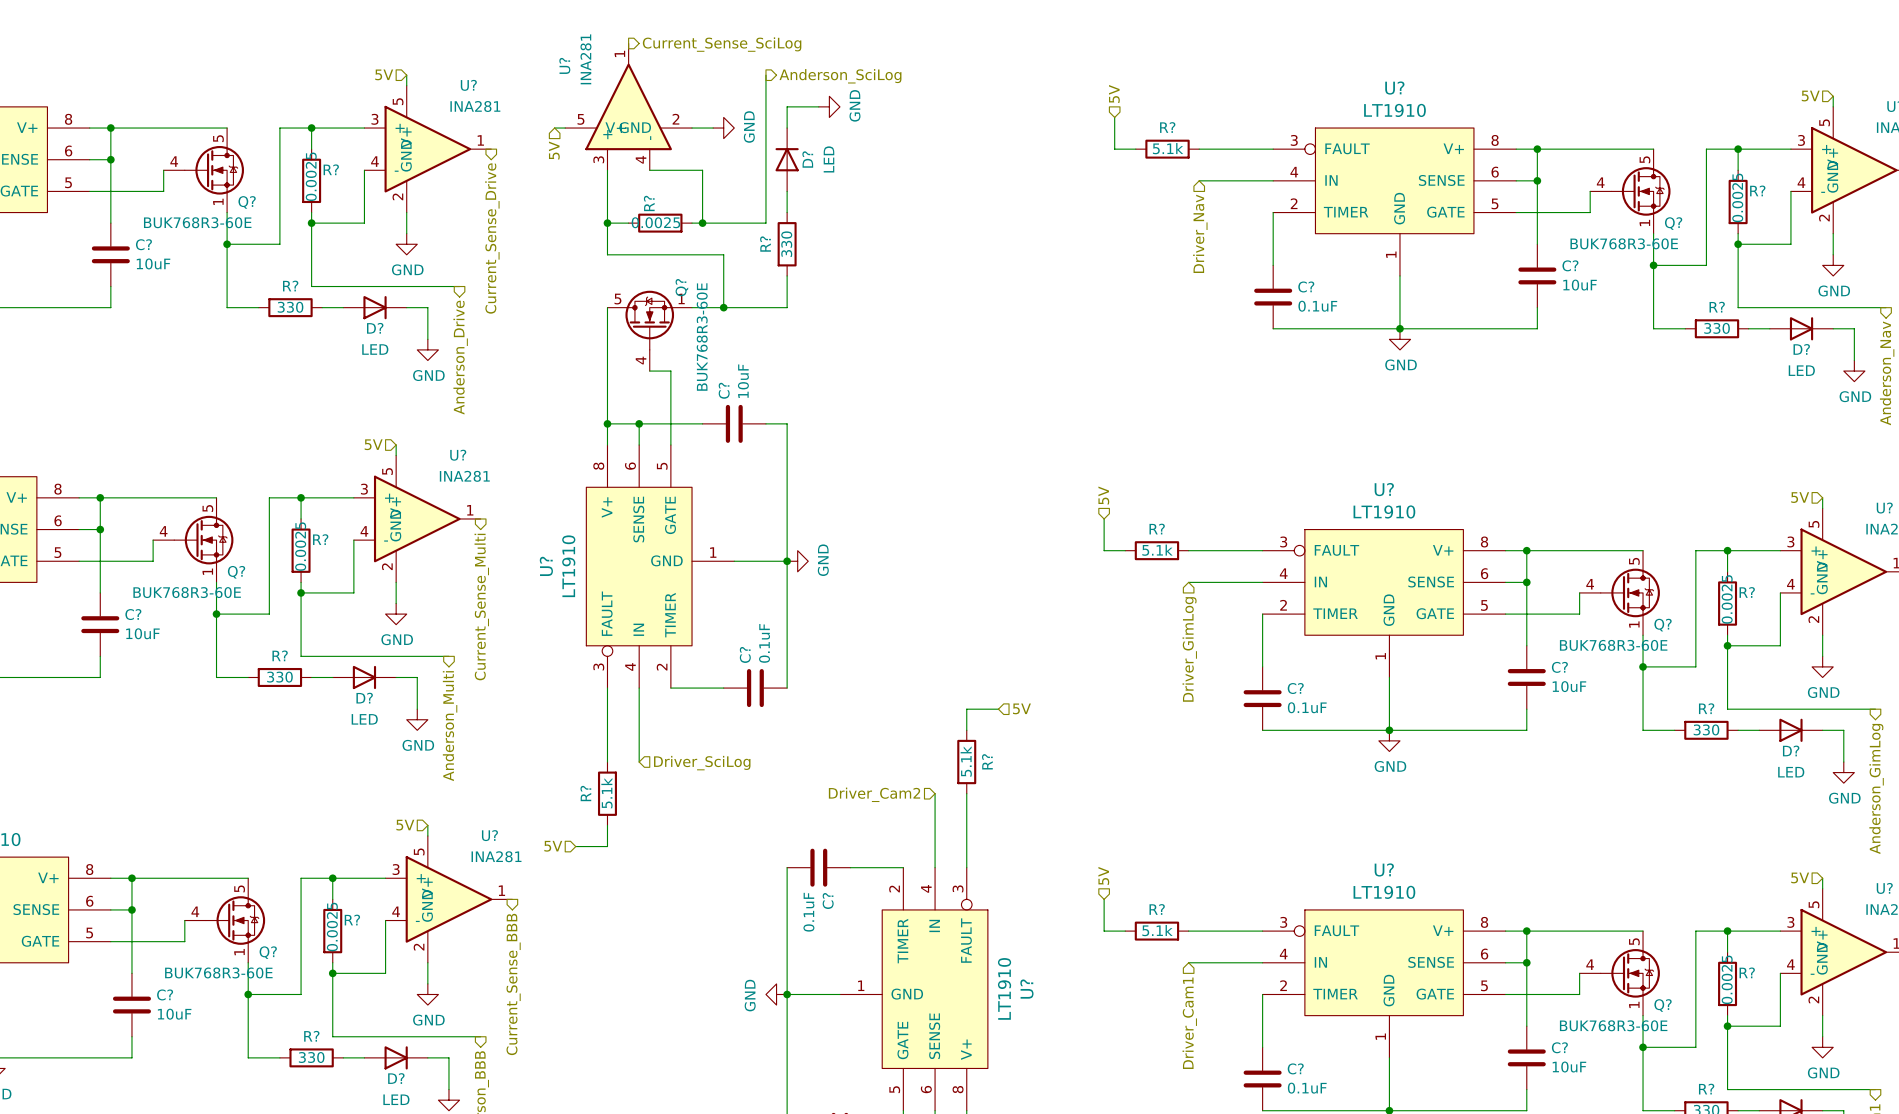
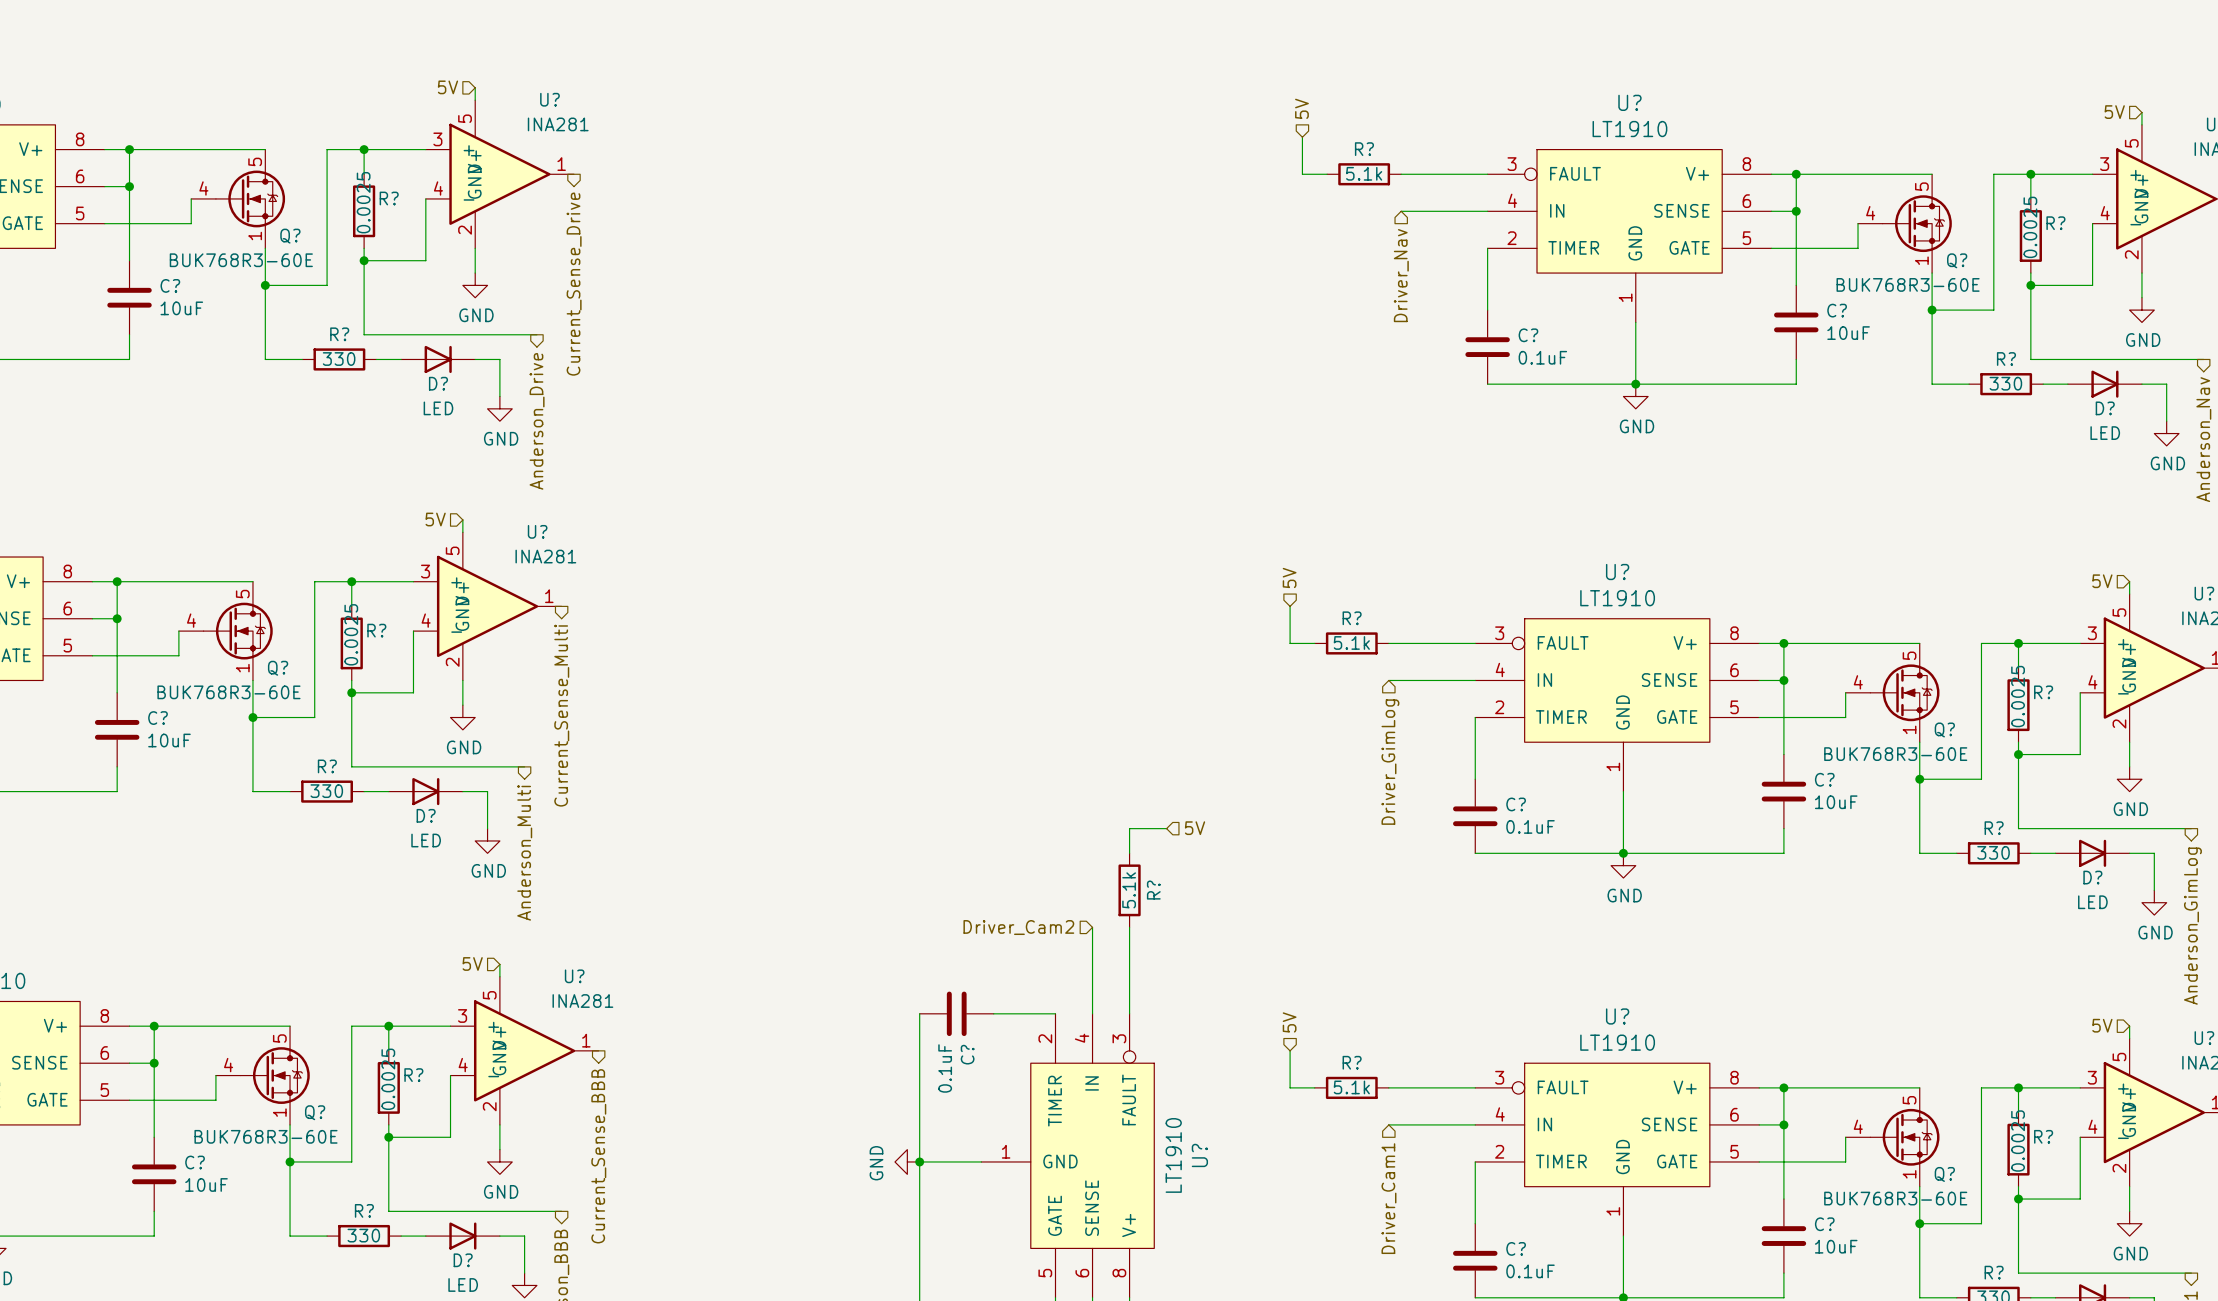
hierarchical label: Current_Sense_SciLog (722, 44) -> none
wire: (765, 75) (765, 223) (692, 223) -> none
hierarchical label: Anderson_SciLog (840, 76) -> none
U?: INA281 (628, 106) -> none
wire: (818, 106) (787, 106) (787, 128) -> none
power symbol: GND (829, 106) -> none
wire: (554, 128) (565, 128) -> none
wire: (692, 128) (713, 128) -> none
power symbol: GND (723, 128) -> none
hierarchical label: 5V (554, 150) -> none
D?: LED (787, 159) -> none
wire: (607, 170) (607, 254) (723, 254) (723, 307) -> none
wire: (649, 170) (702, 170) (702, 223) -> none
wire: (787, 191) (787, 212) -> none
wire: (607, 223) (628, 223) -> none
junction: (607, 223) -> none
R?: 0.0025 (660, 223) -> none
junction: (702, 223) -> none
R?: 330 (787, 244) -> none
wire: (787, 275) (787, 307) (692, 307) -> none
wire: (607, 307) (607, 445) -> none
junction: (723, 307) -> none
Q?: BUK768R3-60E (649, 330) -> none
wire: (649, 371) (670, 371) (670, 445) -> none
wire: (607, 423) (702, 423) -> none
junction: (607, 423) -> none
wire: (639, 423) (639, 445) -> none
junction: (639, 423) -> none
C?: 10uF (734, 423) -> none
wire: (765, 423) (787, 423) (787, 688) -> none
wire: (734, 561) (787, 561) -> none
junction: (787, 561) -> none
power symbol: GND (797, 561) -> none
U?: LT1910 (660, 566) -> none
wire: (607, 688) (607, 762) -> none
wire: (639, 688) (639, 762) -> none
wire: (670, 688) (723, 688) -> none
C?: 0.1uF (755, 688) -> none
hierarchical label: Driver_SciLog (702, 763) -> none
R?: 5.1k (607, 793) -> none
wire: (607, 825) (607, 846) (575, 846) -> none
hierarchical label: 5V (553, 846) -> none

